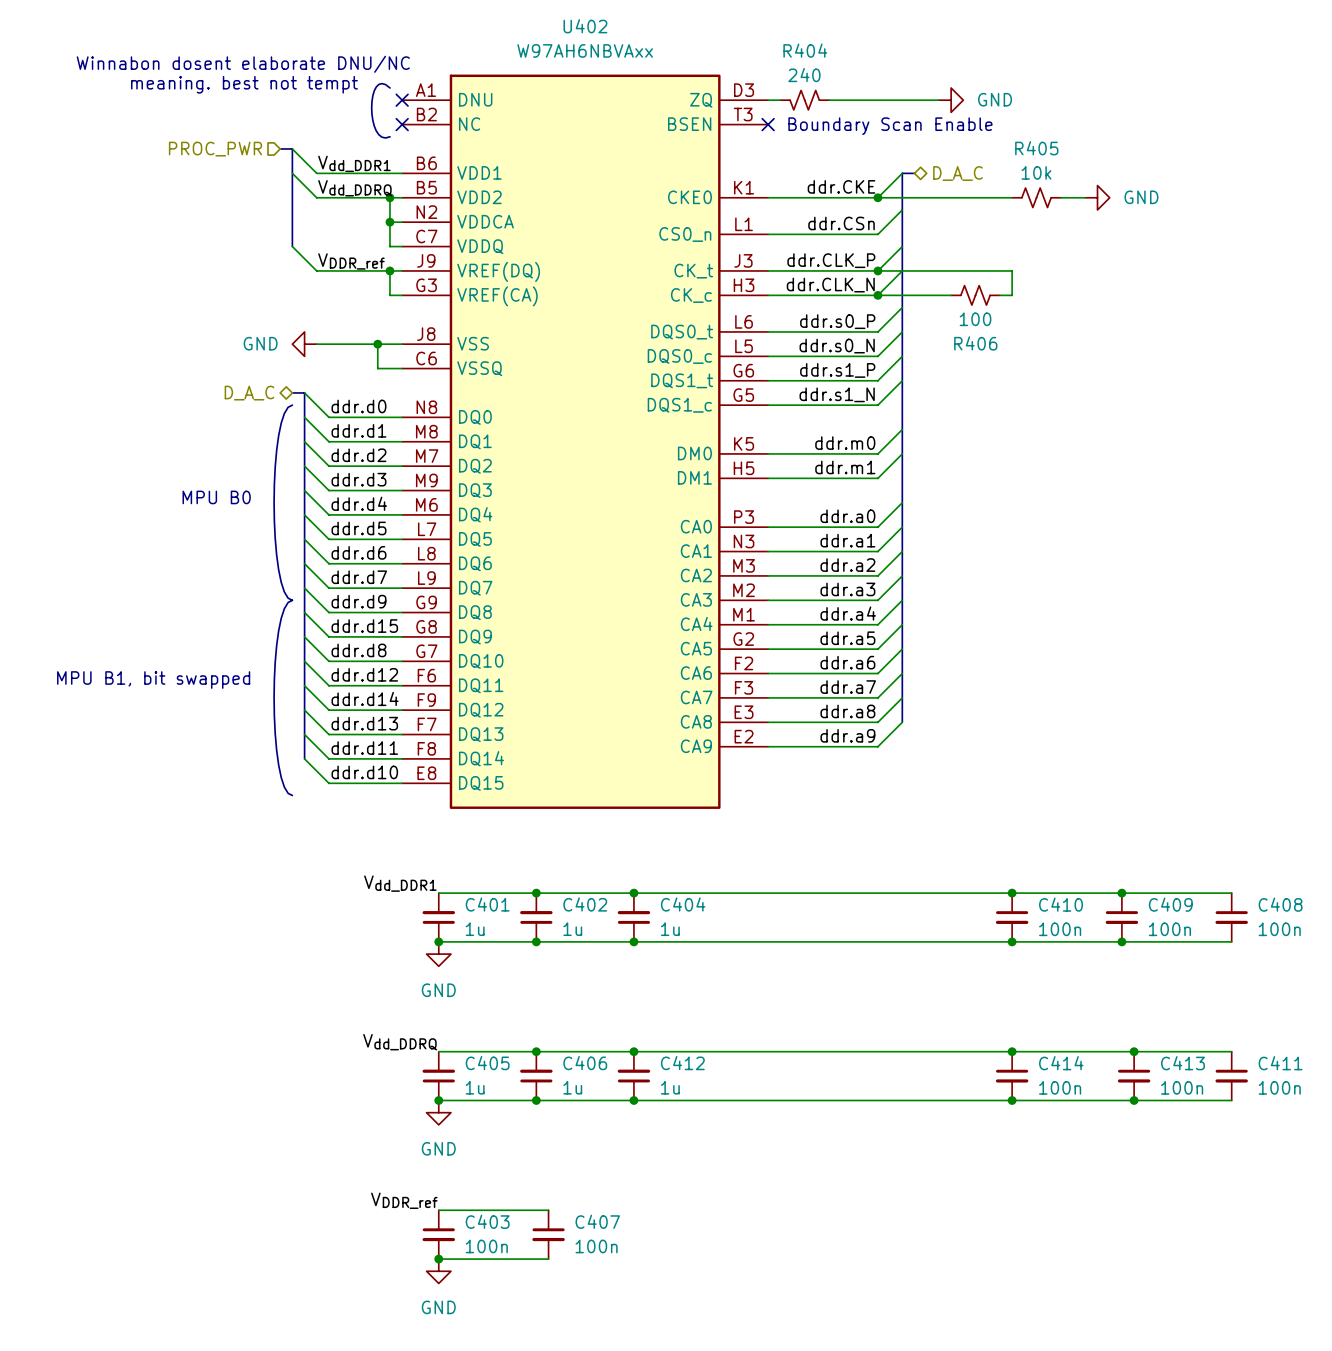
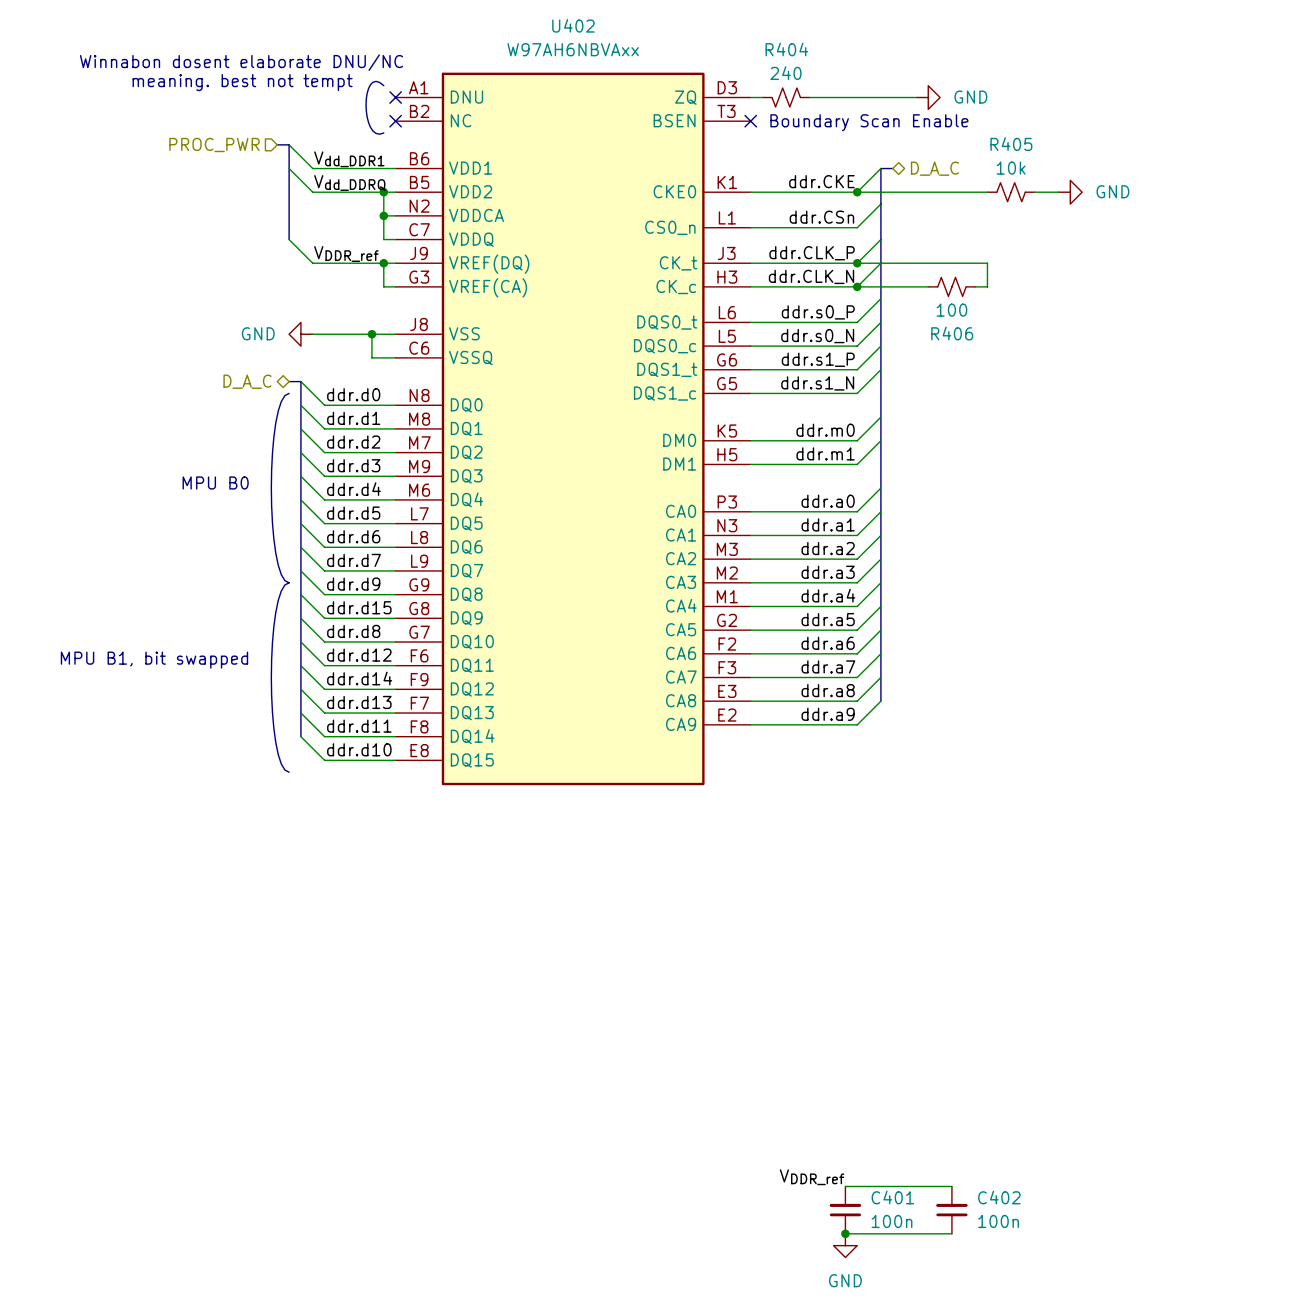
label: Vdd_DDR1 (400, 883) -> none
wire: (438, 893) (1231, 893) -> none
junction: (536, 893) -> none
junction: (633, 893) -> none
junction: (1012, 893) -> none
junction: (1121, 893) -> none
C401 position: (438, 917) -> (845, 1210)
C402 position: (536, 917) -> (951, 1210)
C404: 1u (633, 917) -> none
C410: 100n (1012, 917) -> none
C409: 100n (1121, 917) -> none
C408: 100n (1231, 917) -> none
C401 value: 1u (475, 929) -> 100n (892, 1221)
C402 value: 1u (572, 929) -> 100n (998, 1221)
wire: (438, 941) (1231, 941) -> none
junction: (438, 941) -> none
junction: (536, 941) -> none
junction: (633, 941) -> none
junction: (1012, 941) -> none
junction: (1121, 941) -> none
power symbol: GND (438, 954) -> none
label: Vdd_DDRQ (400, 1042) -> none
wire: (438, 1051) (1231, 1051) -> none
junction: (536, 1051) -> none
junction: (633, 1051) -> none
junction: (1012, 1051) -> none
junction: (1134, 1051) -> none
C405: 1u (438, 1076) -> none
C406: 1u (536, 1076) -> none
C412: 1u (633, 1076) -> none
C414: 100n (1012, 1076) -> none
C413: 100n (1134, 1076) -> none
C411: 100n (1231, 1076) -> none
wire: (438, 1100) (1231, 1100) -> none
junction: (438, 1100) -> none
junction: (536, 1100) -> none
junction: (633, 1100) -> none
junction: (1012, 1100) -> none
junction: (1134, 1100) -> none
power symbol: GND (438, 1112) -> none
label: VDDR_ref (404, 1200) -> none
wire: (438, 1210) (548, 1210) -> none
label: none -> VDDR_ref (812, 1177)
wire: none -> (845, 1186) (951, 1186)
C403: 100n (438, 1234) -> none
C407: 100n (548, 1234) -> none
wire: (438, 1259) (548, 1259) -> none
junction: (438, 1259) -> none
power symbol: GND (438, 1271) -> none
wire: none -> (845, 1233) (951, 1233)
junction: none -> (845, 1233)
power symbol: none -> GND (845, 1245)

